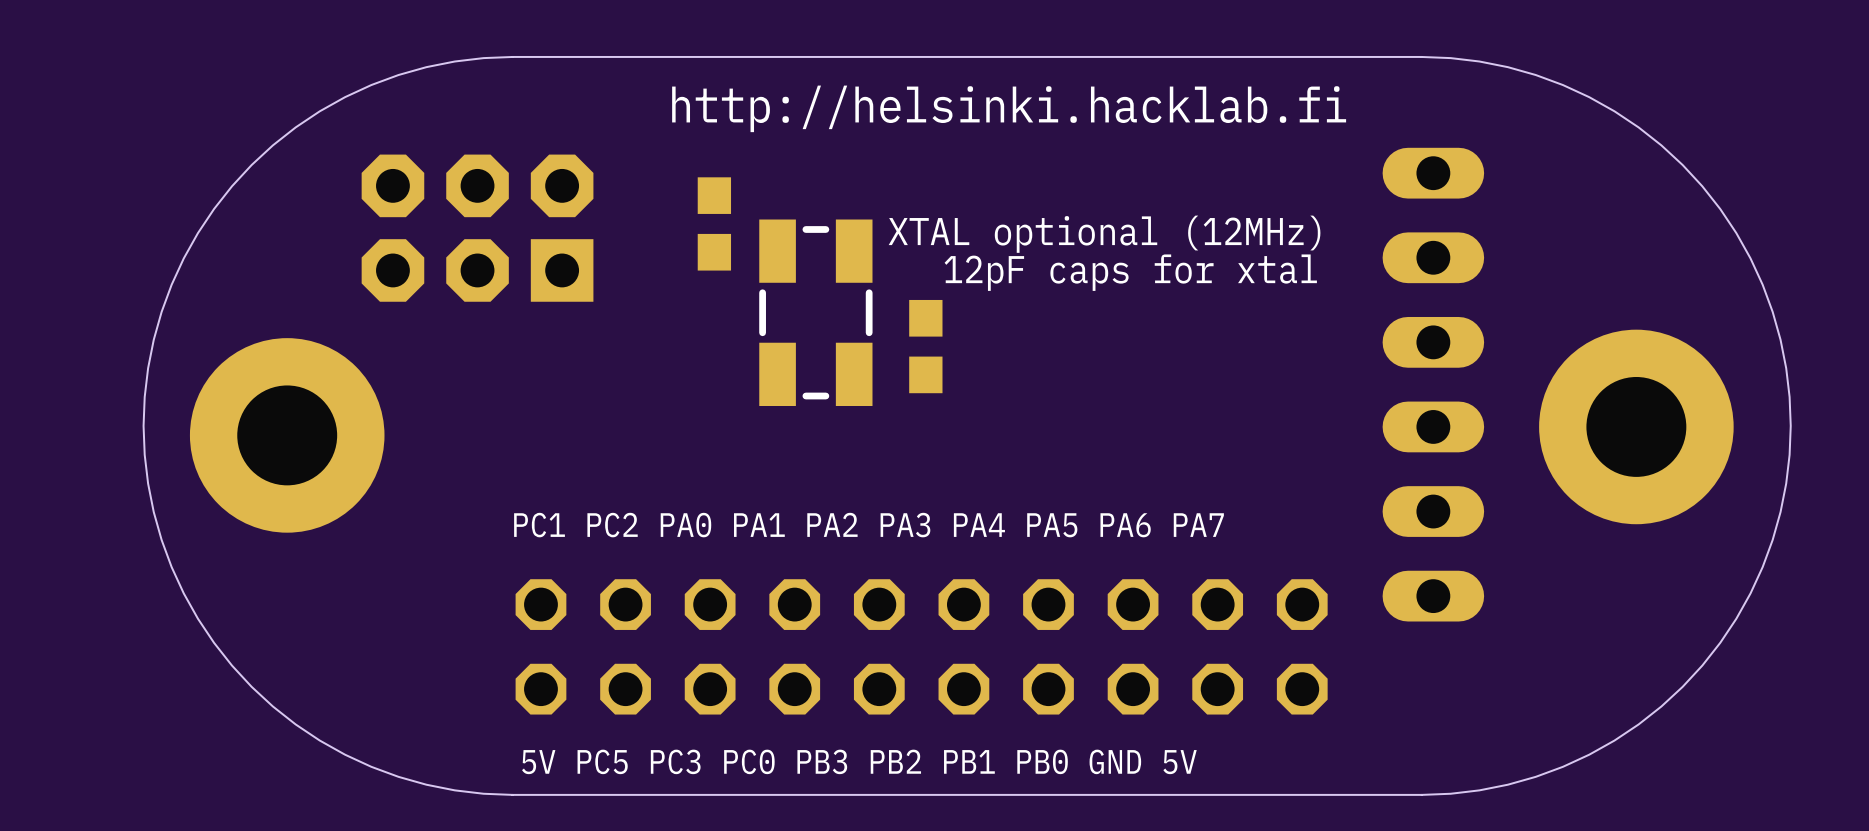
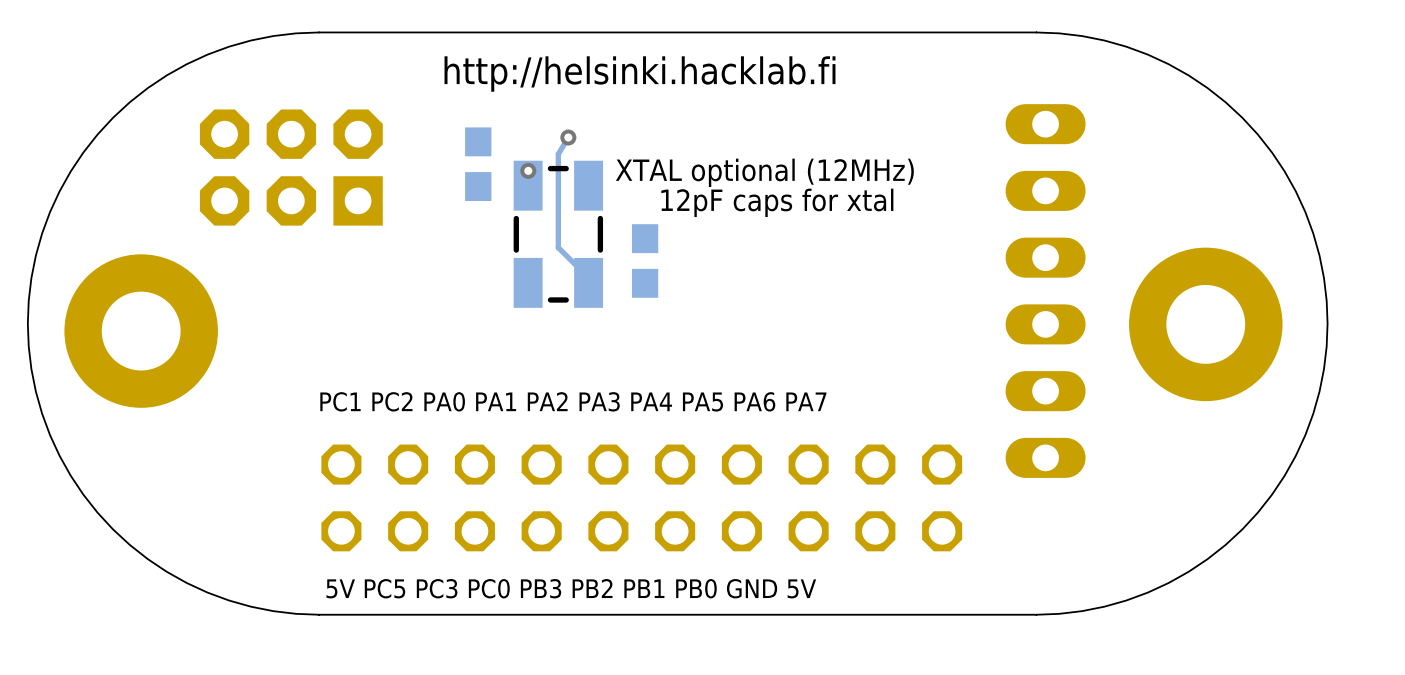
track: none -> (568, 137) (558, 154) (558, 247) (588, 277) (588, 282)
via: none -> (568, 137)
via: none -> (528, 170)

